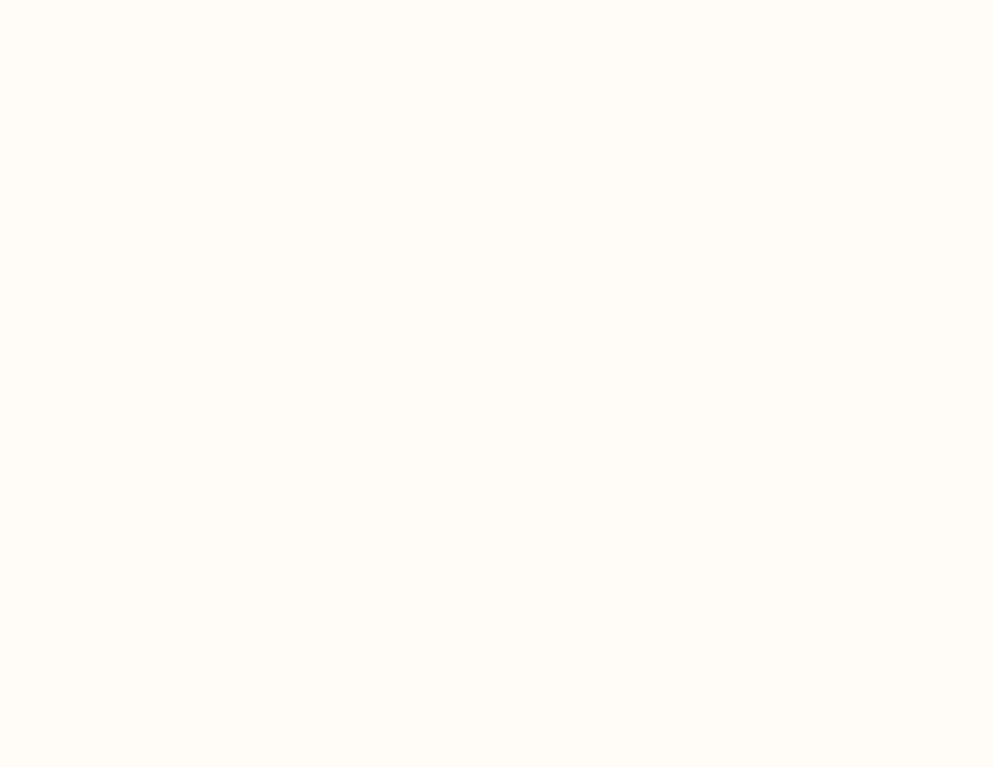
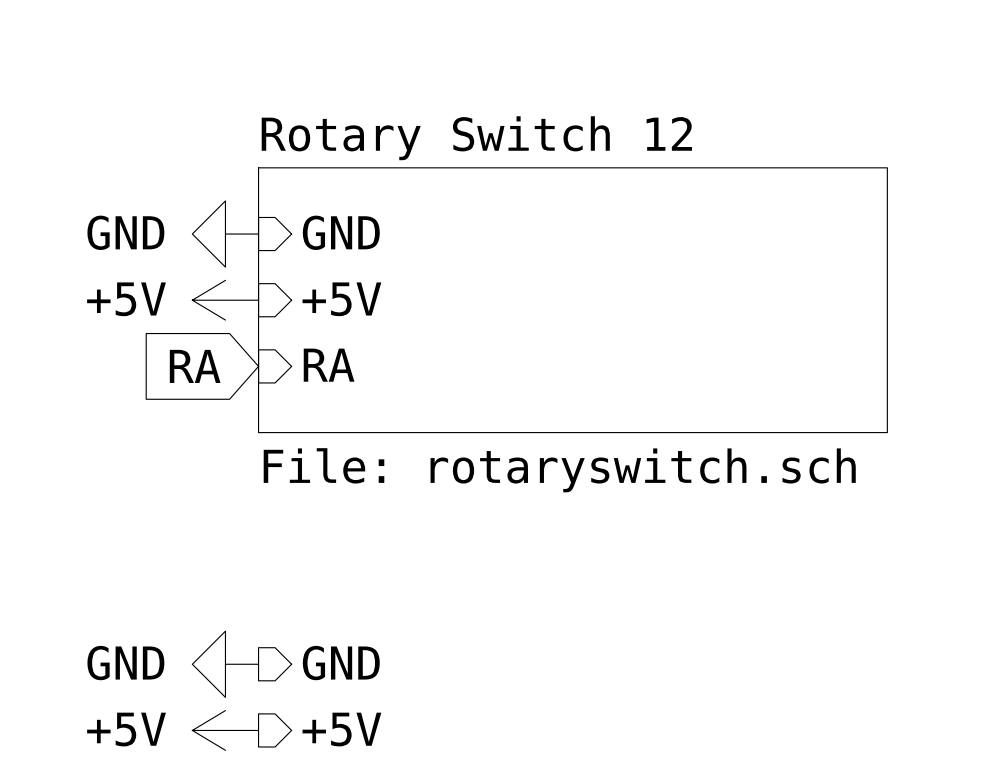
sheet pin: none -> GND (341, 232)
power symbol: none -> GND (225, 234)
sheet pin: none -> +5V (341, 299)
power symbol: none -> +5V (225, 300)
sheet Rotary Switch 12: none -> File: rotaryswitch.sch (572, 300)
sheet pin: none -> RA (329, 365)
global label: none -> RA (195, 366)
sheet pin: none -> GND (341, 663)
power symbol: none -> GND (225, 664)
sheet pin: none -> +5V (341, 729)
power symbol: none -> +5V (225, 730)

